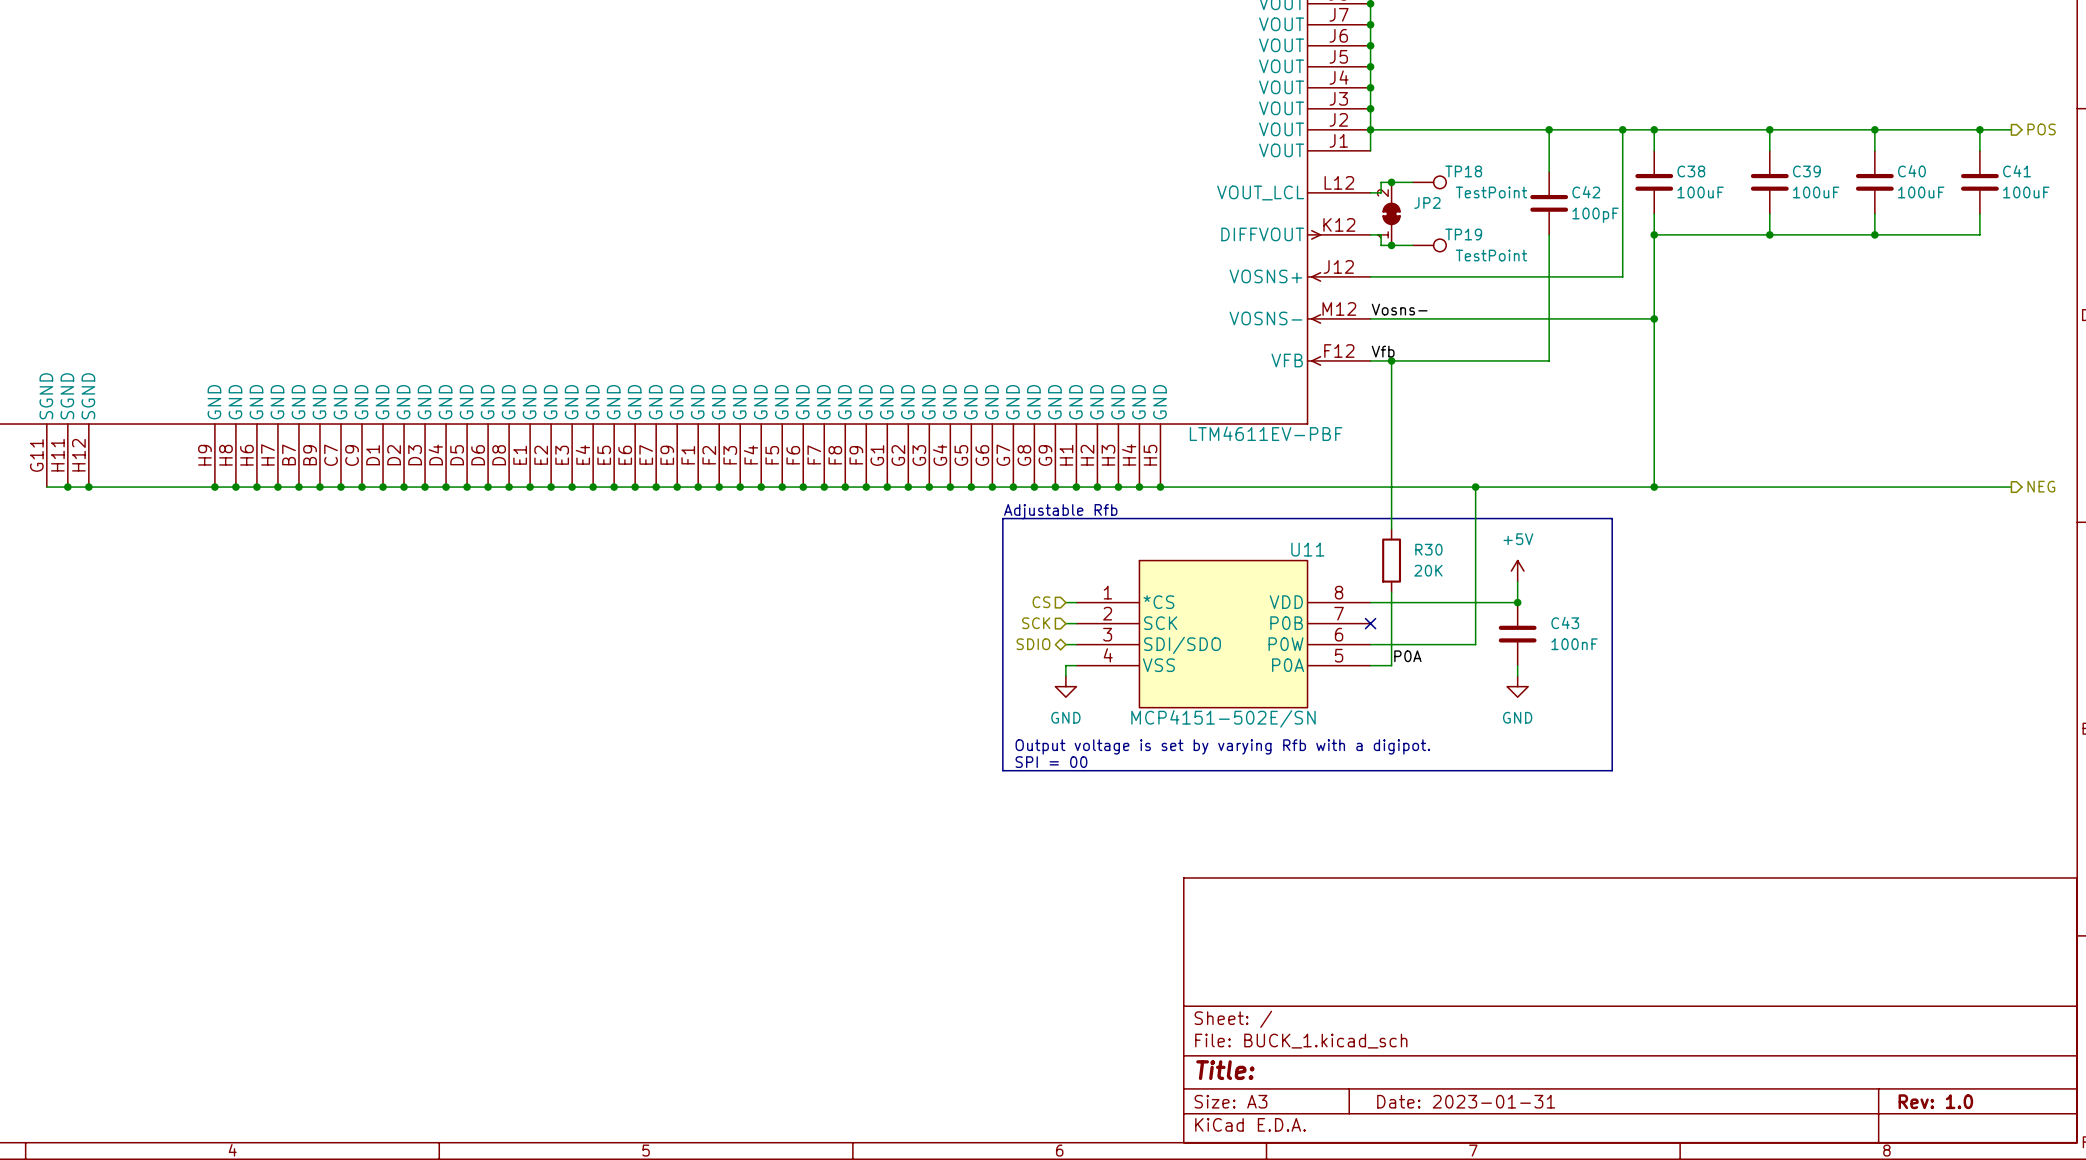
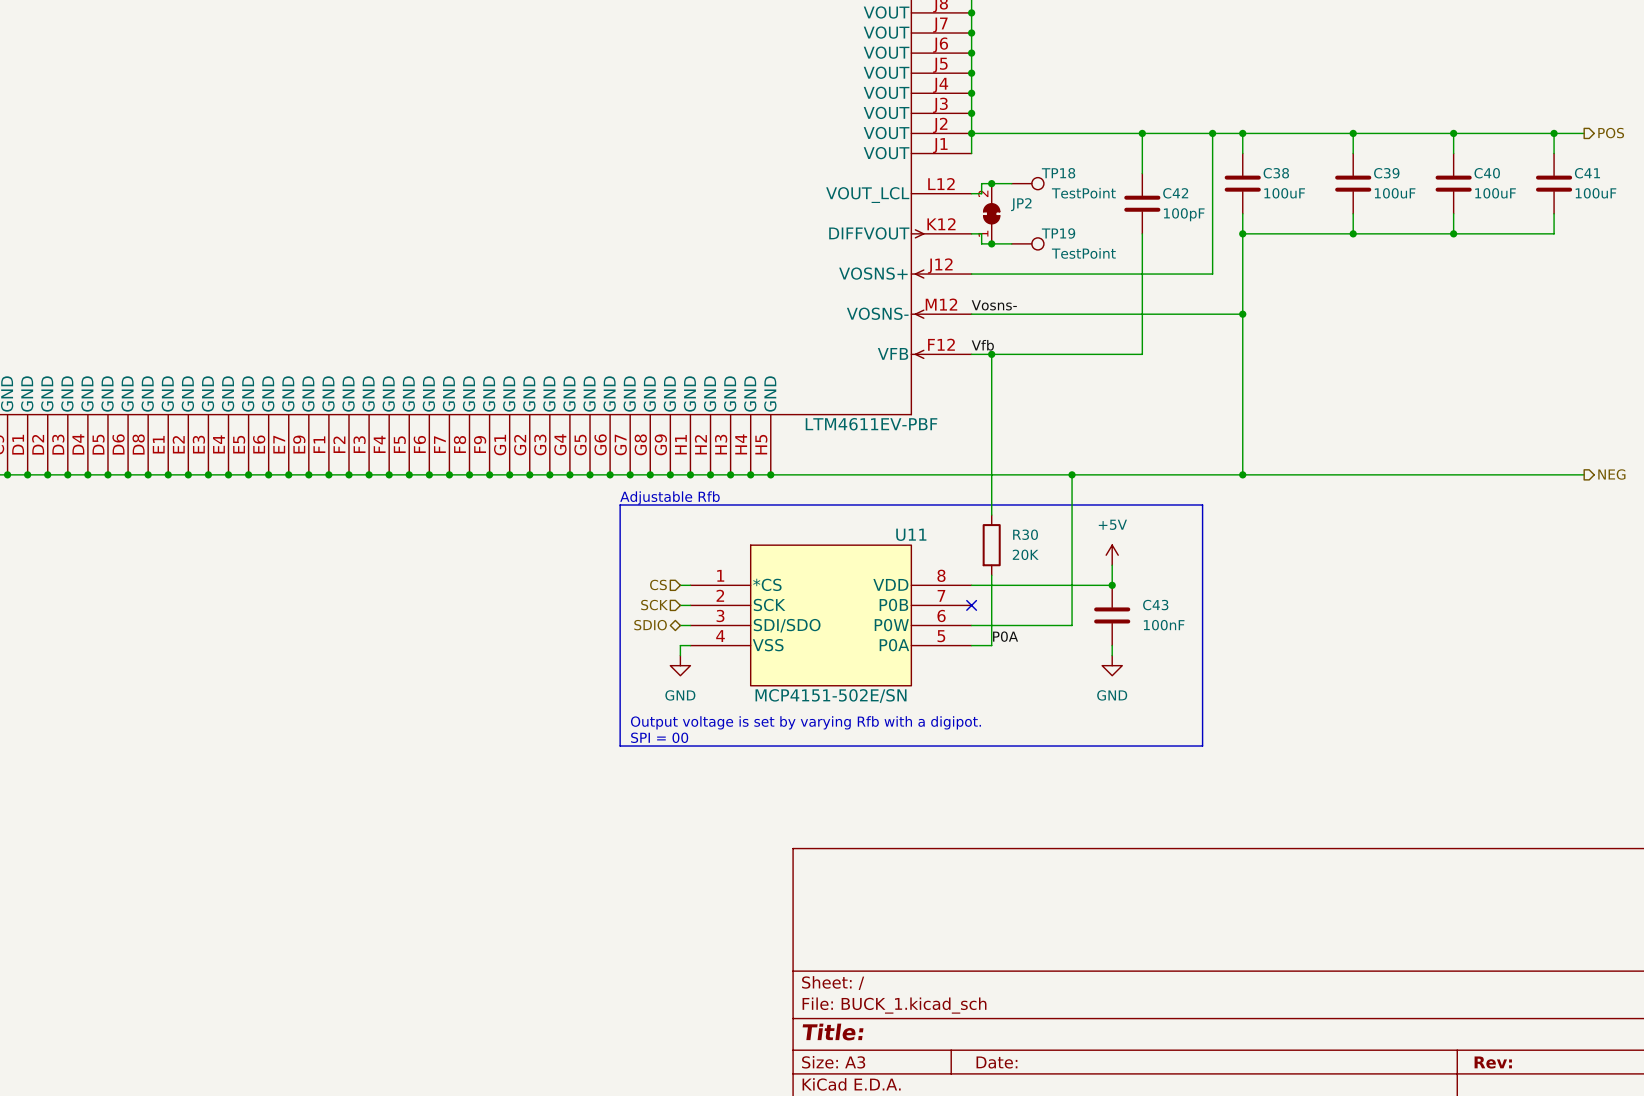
title block: Date: 2023-01-31 (1466, 1101) -> Date: (996, 1062)
title block: Rev: 1.0 (1935, 1101) -> Rev: (1493, 1062)

